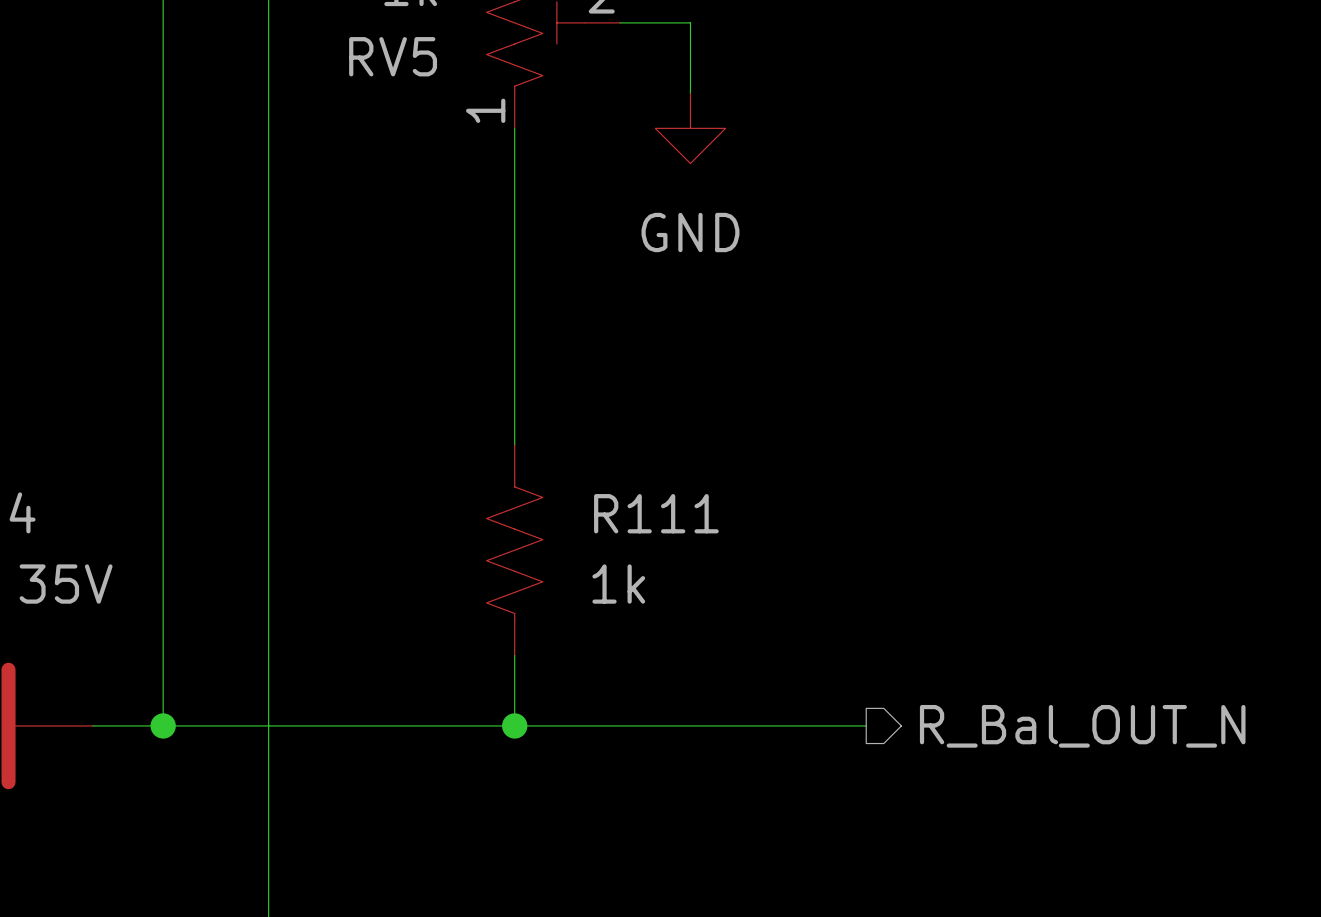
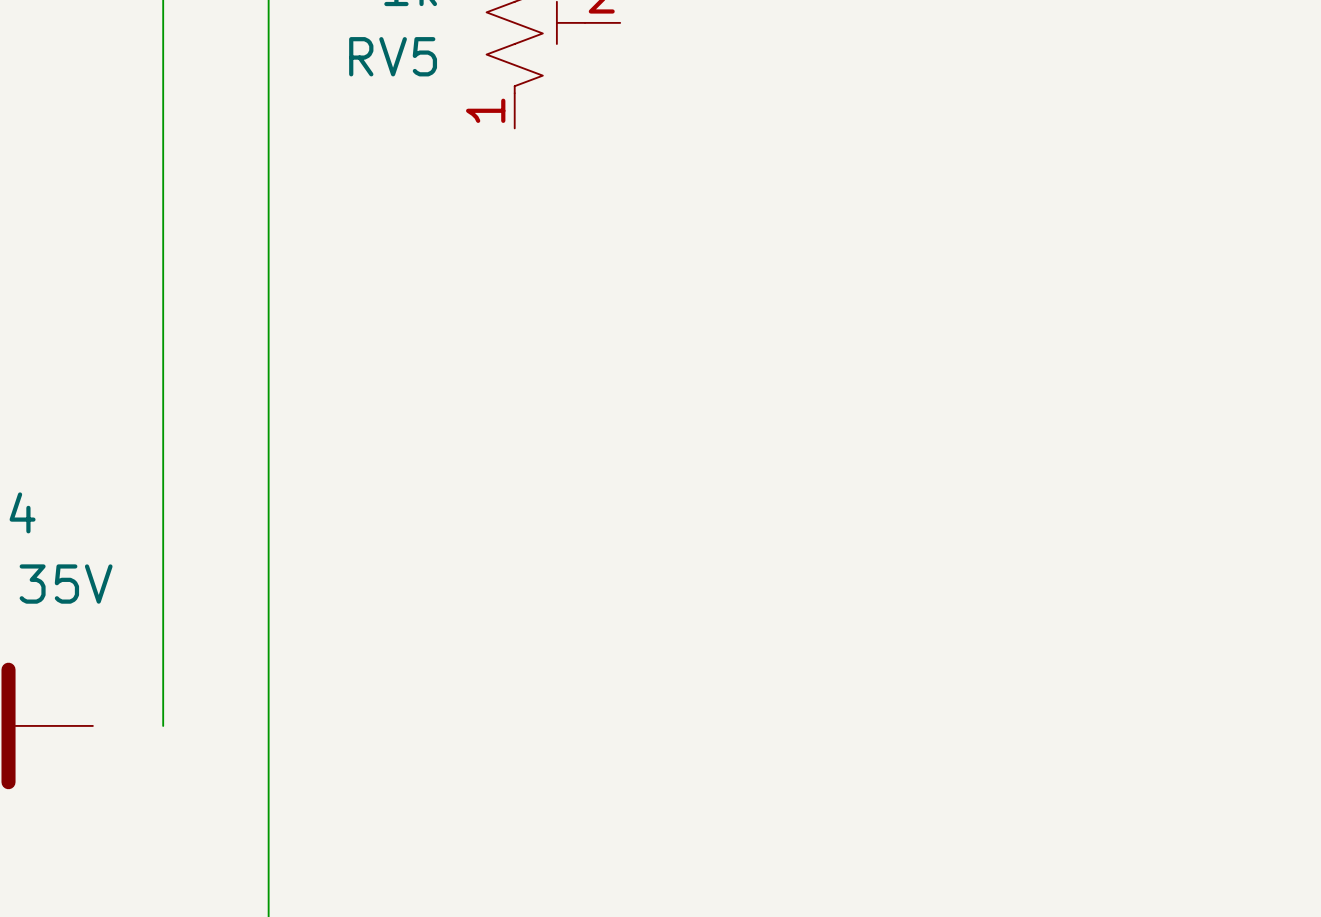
wire: (620, 22) (690, 22) (690, 93) -> none
wire: (514, 128) (514, 444) -> none
power symbol: GND (690, 128) -> none
R111: 1k (514, 550) -> none
wire: (514, 655) (514, 725) -> none
wire: (92, 725) (866, 725) -> none
junction: (163, 725) -> none
junction: (514, 725) -> none
hierarchical label: R_Bal_OUT_N (1082, 726) -> none

